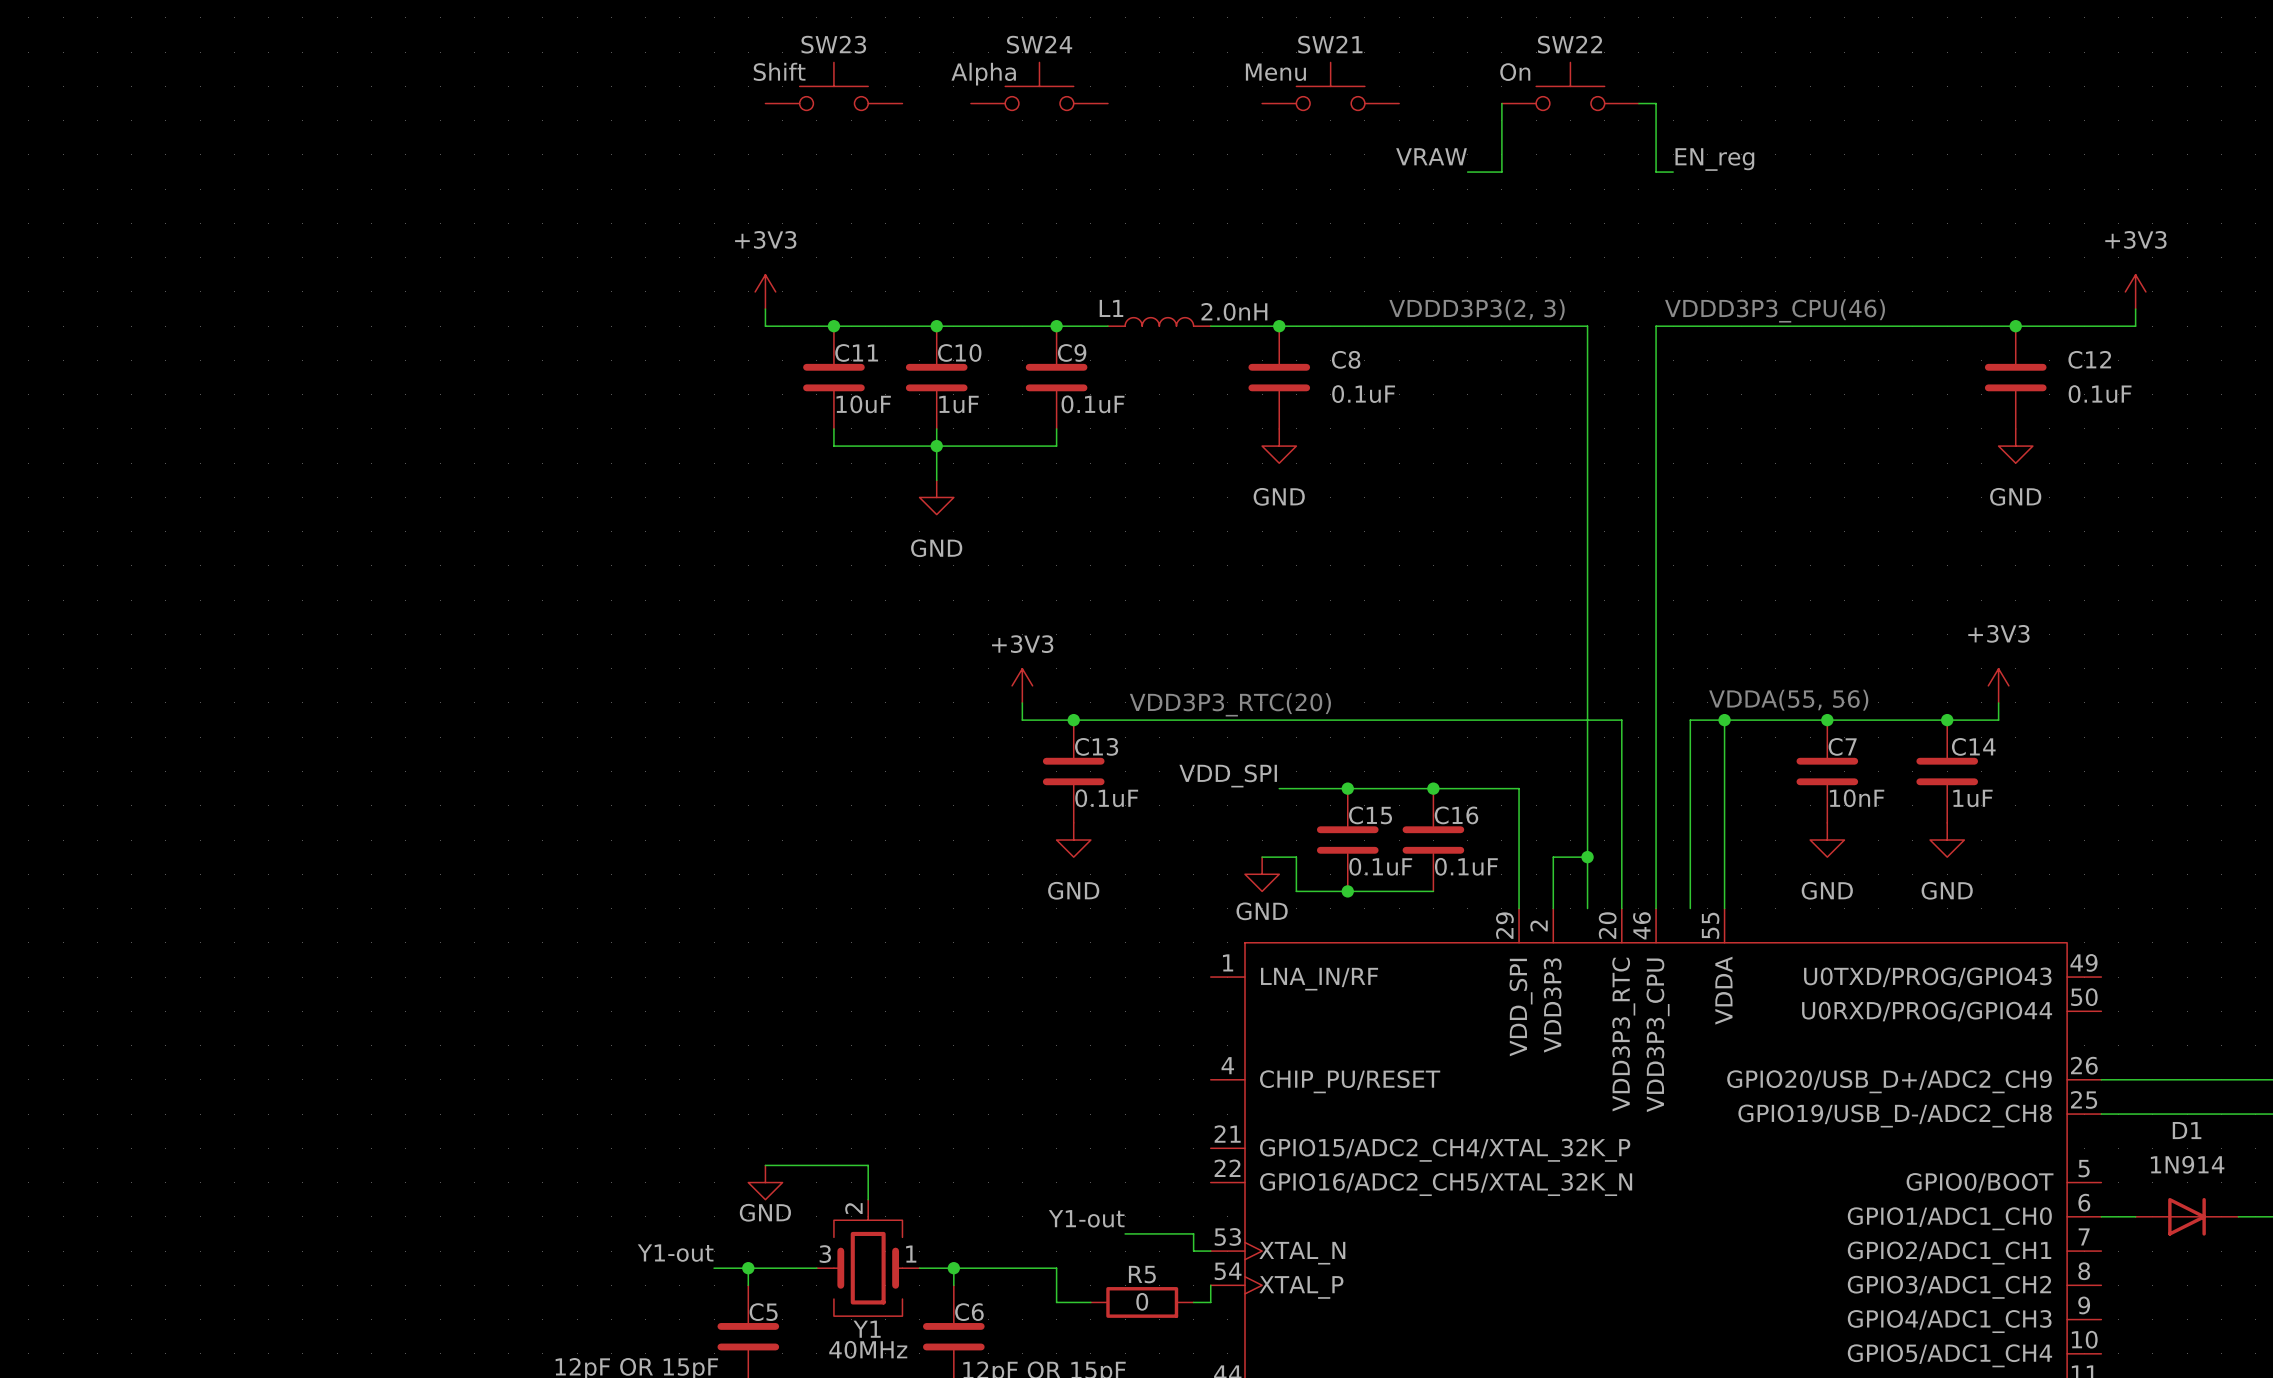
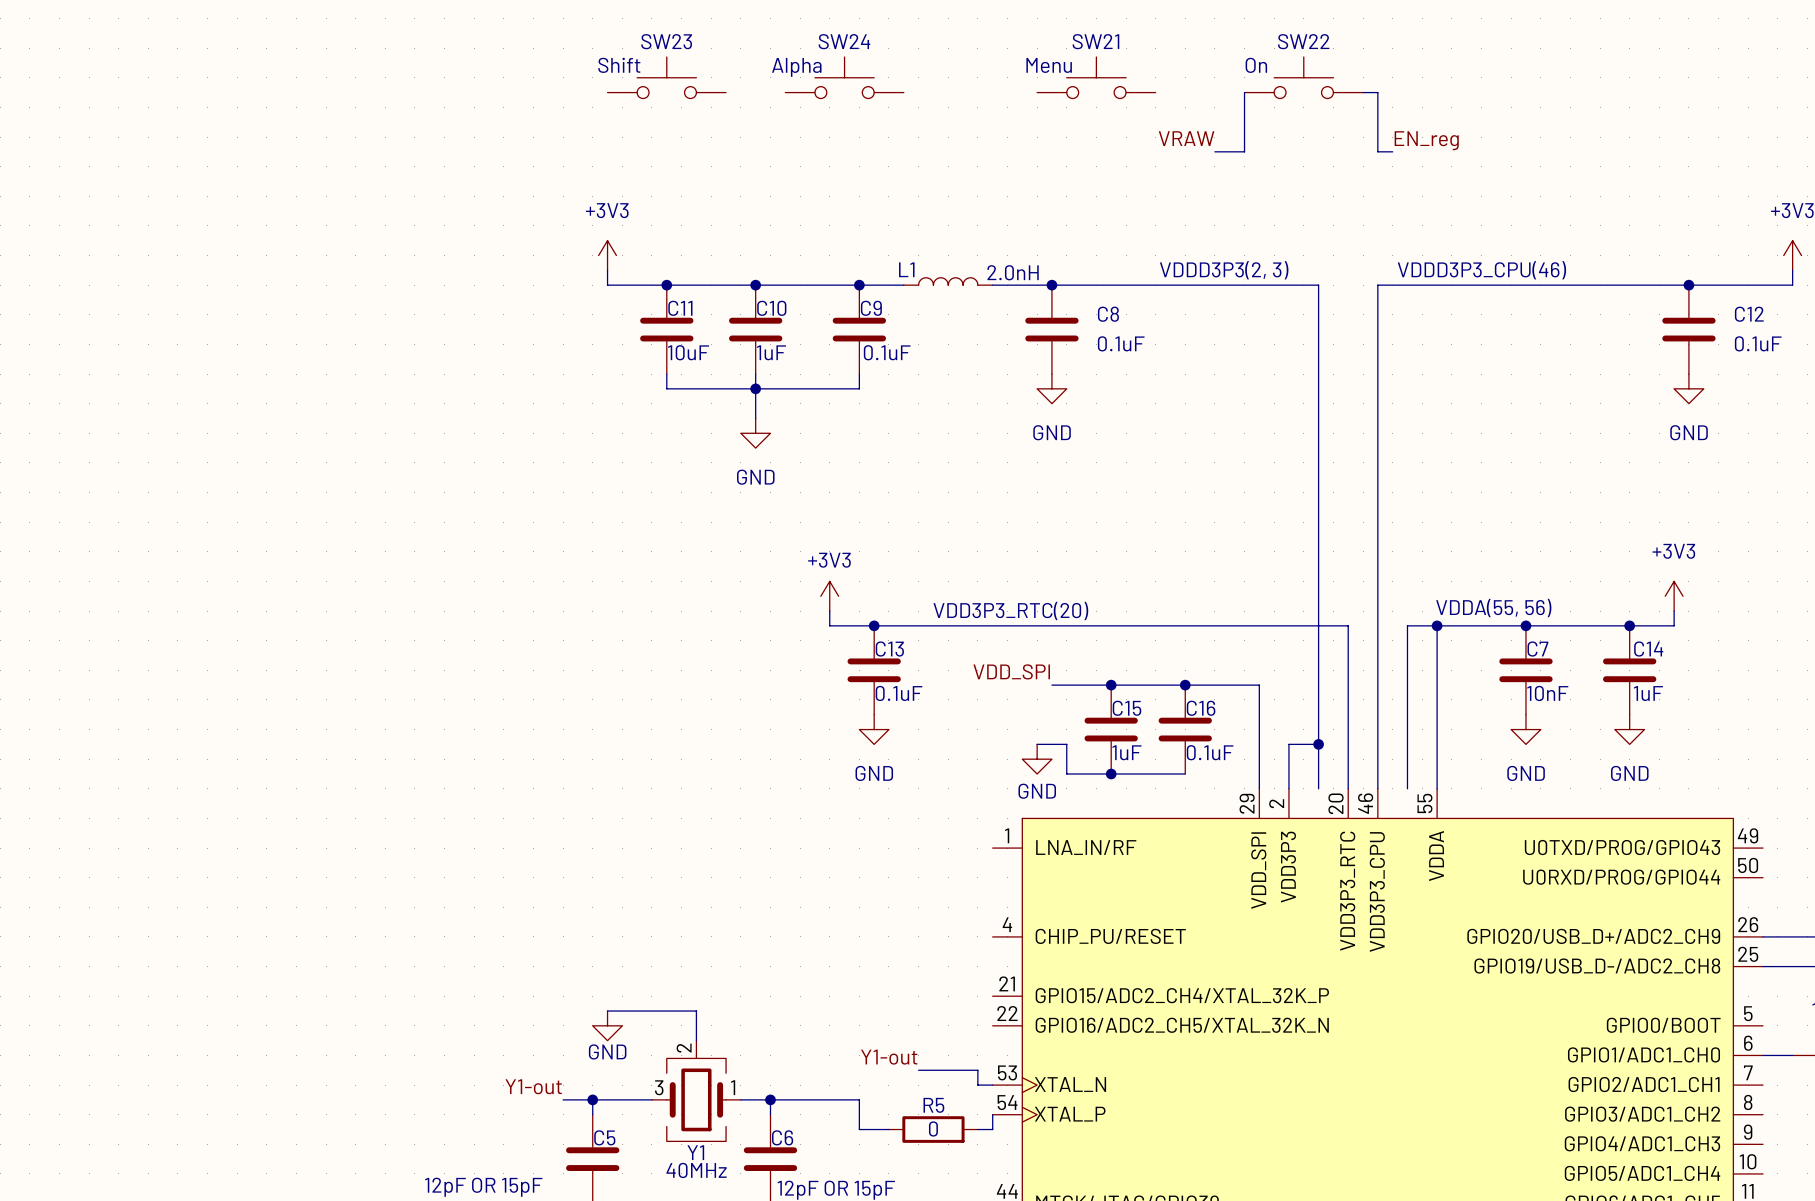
C15 value: 0.1uF (1380, 866) -> 1uF (1126, 752)

